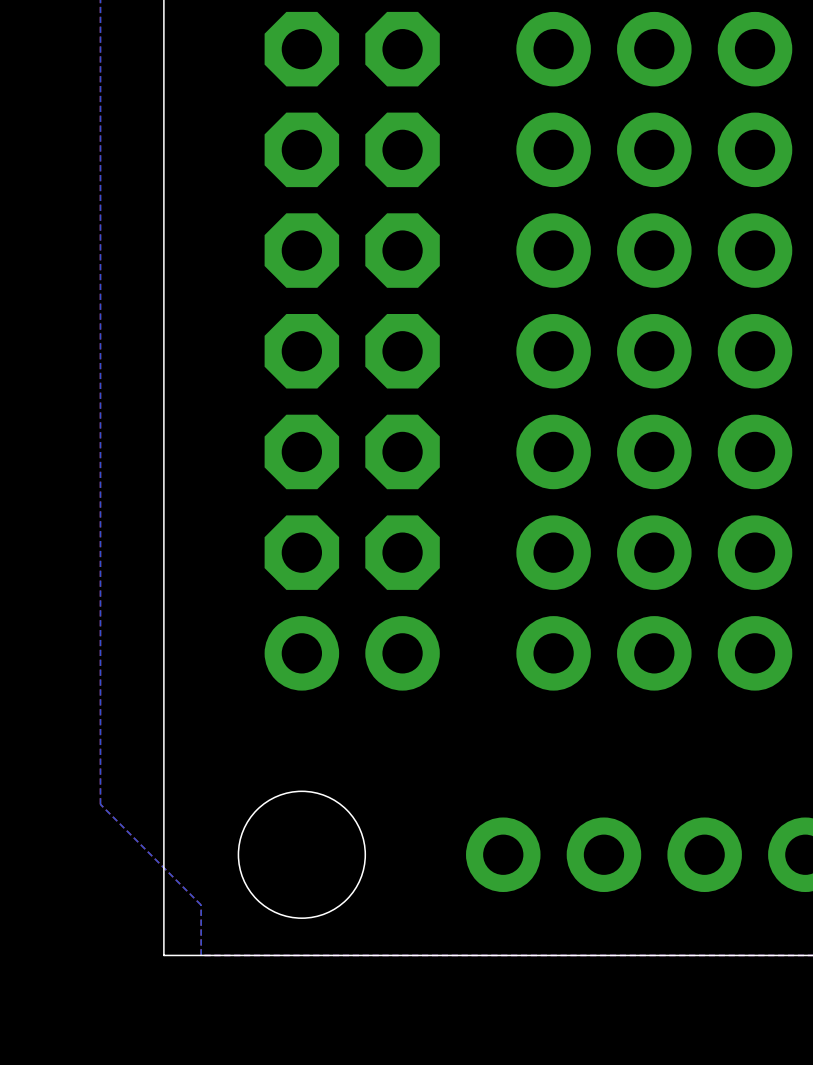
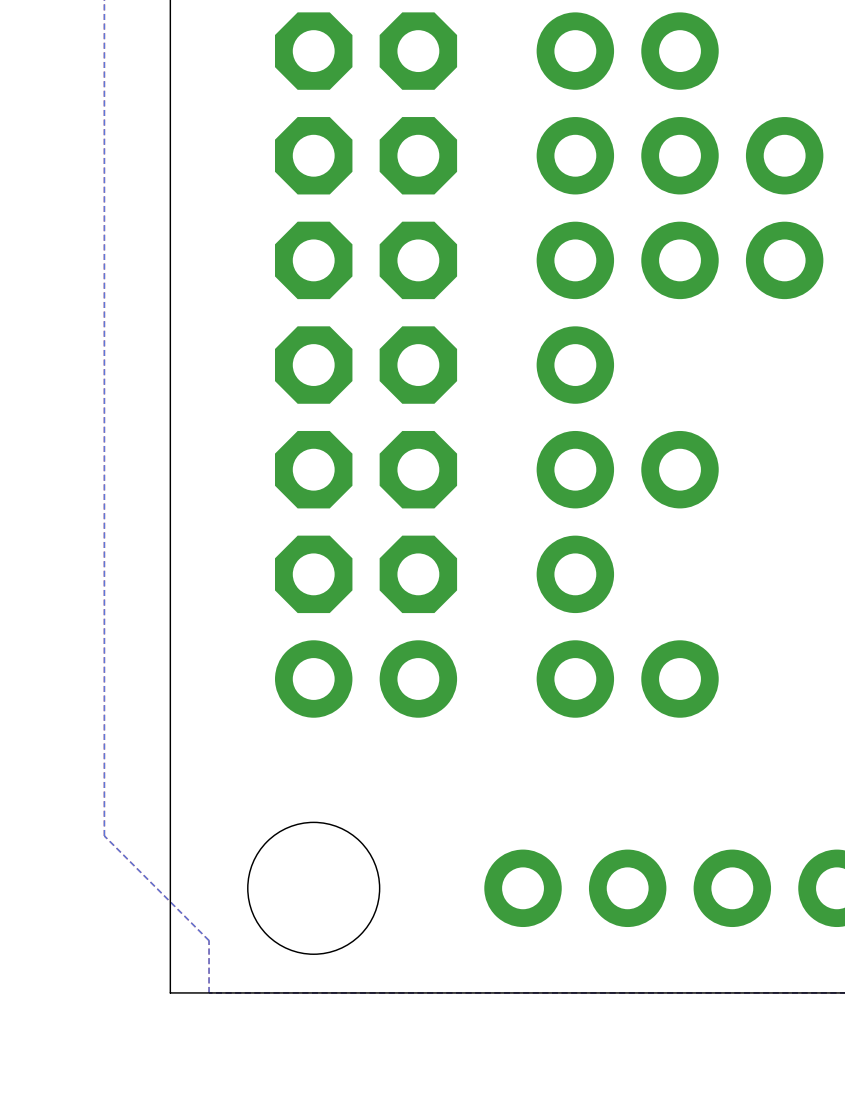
part: (755, 49) -> none
part: (654, 351) -> none
part: (755, 351) -> none
part: (755, 451) -> none
part: (654, 552) -> none
part: (755, 552) -> none
part: (755, 653) -> none

